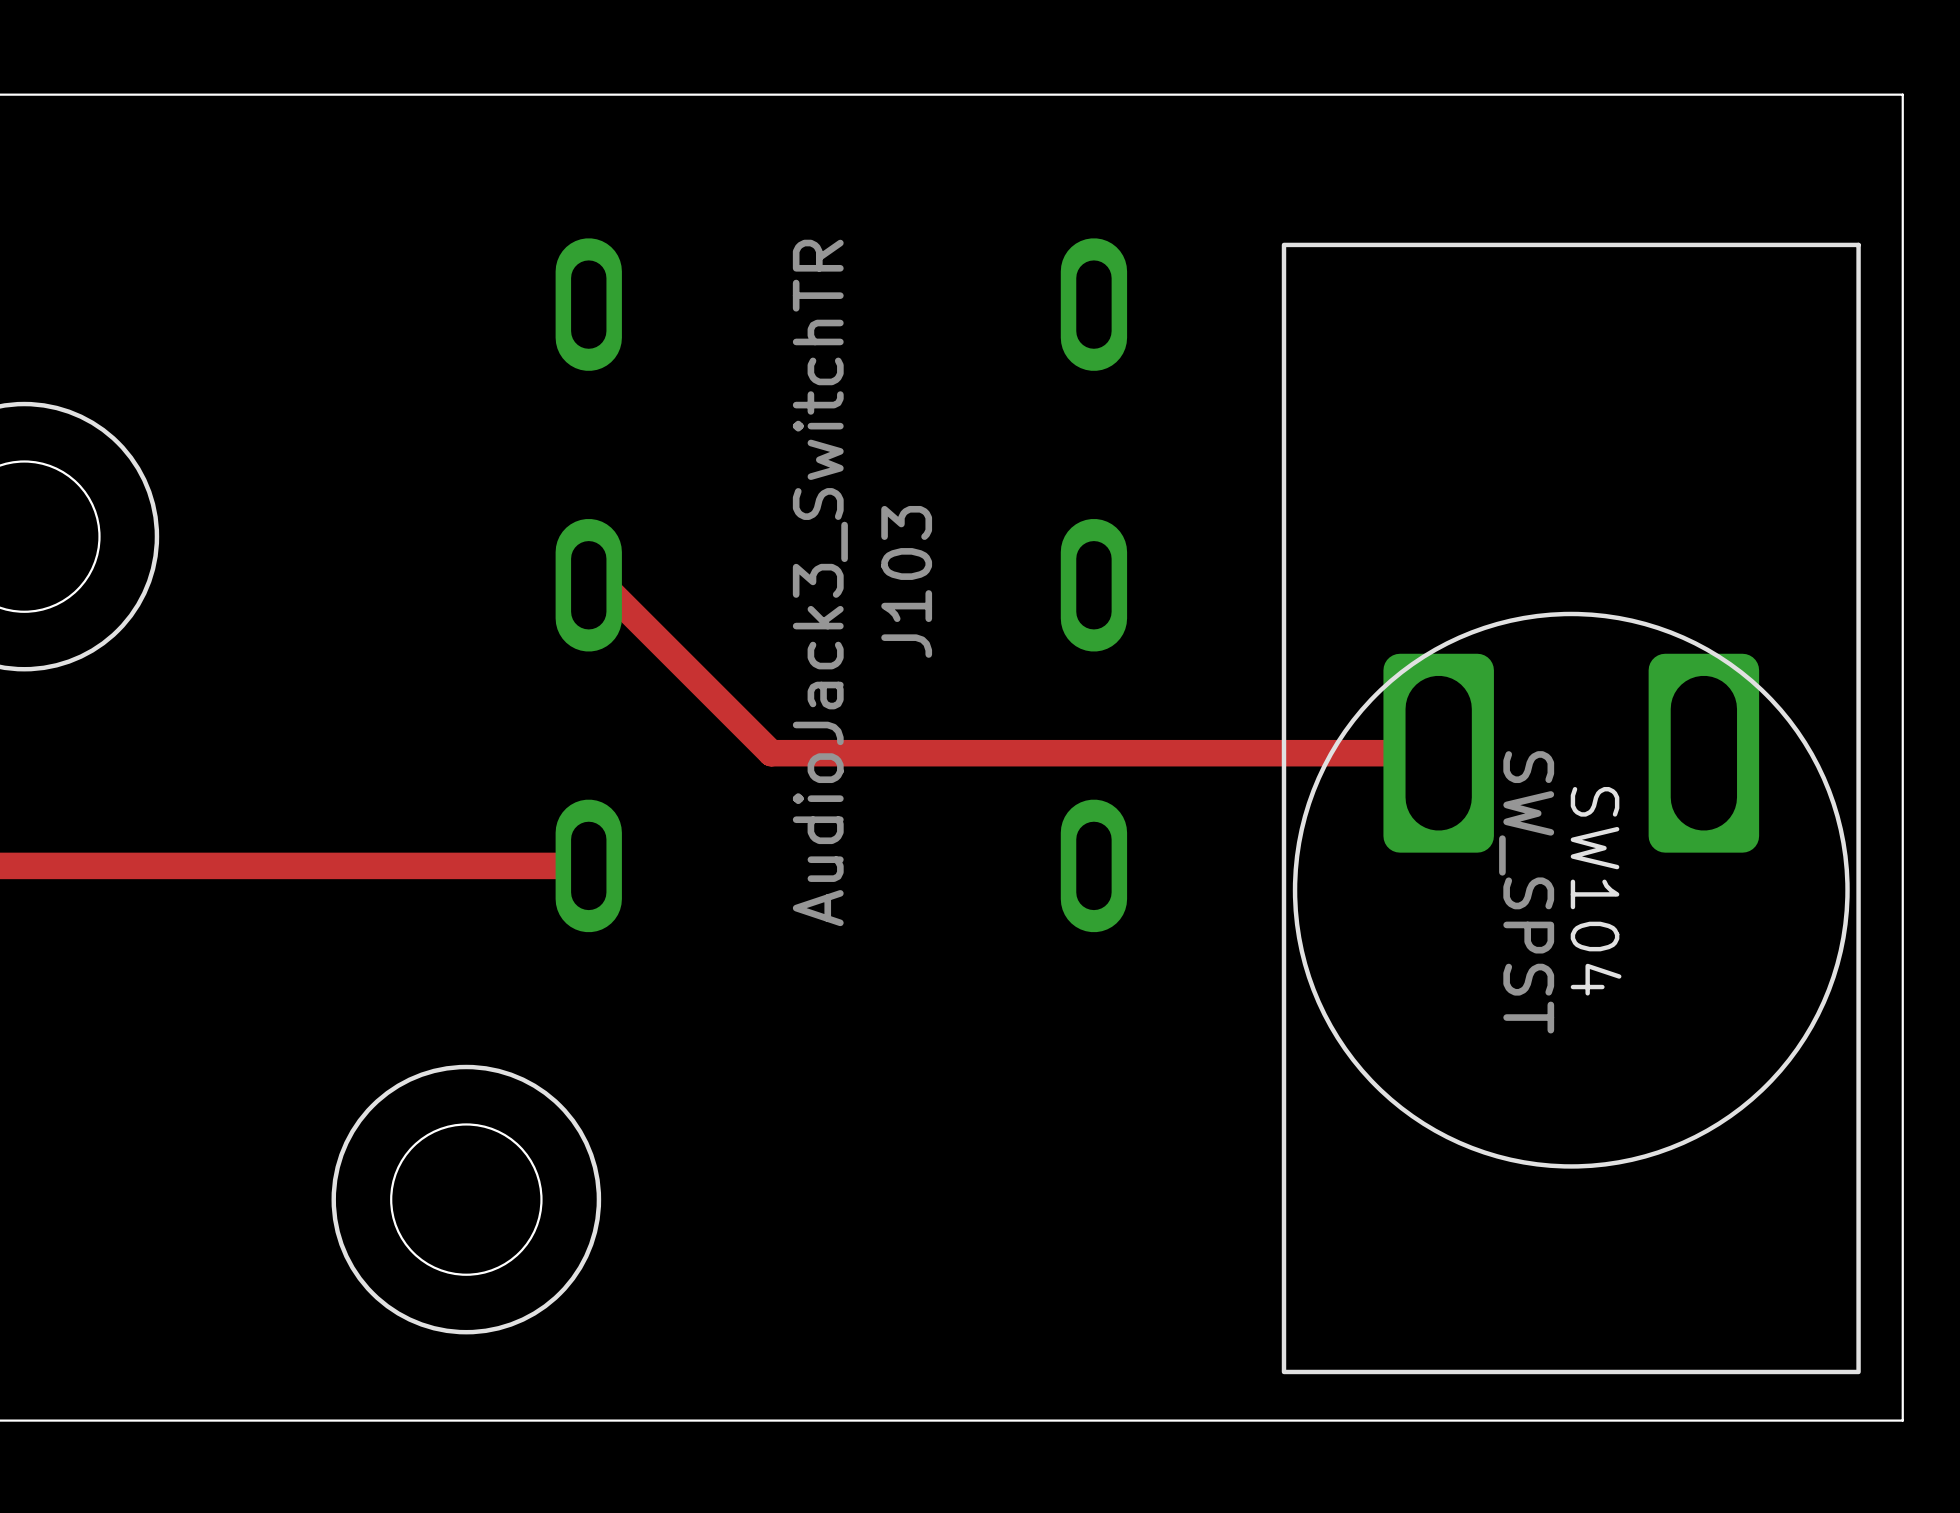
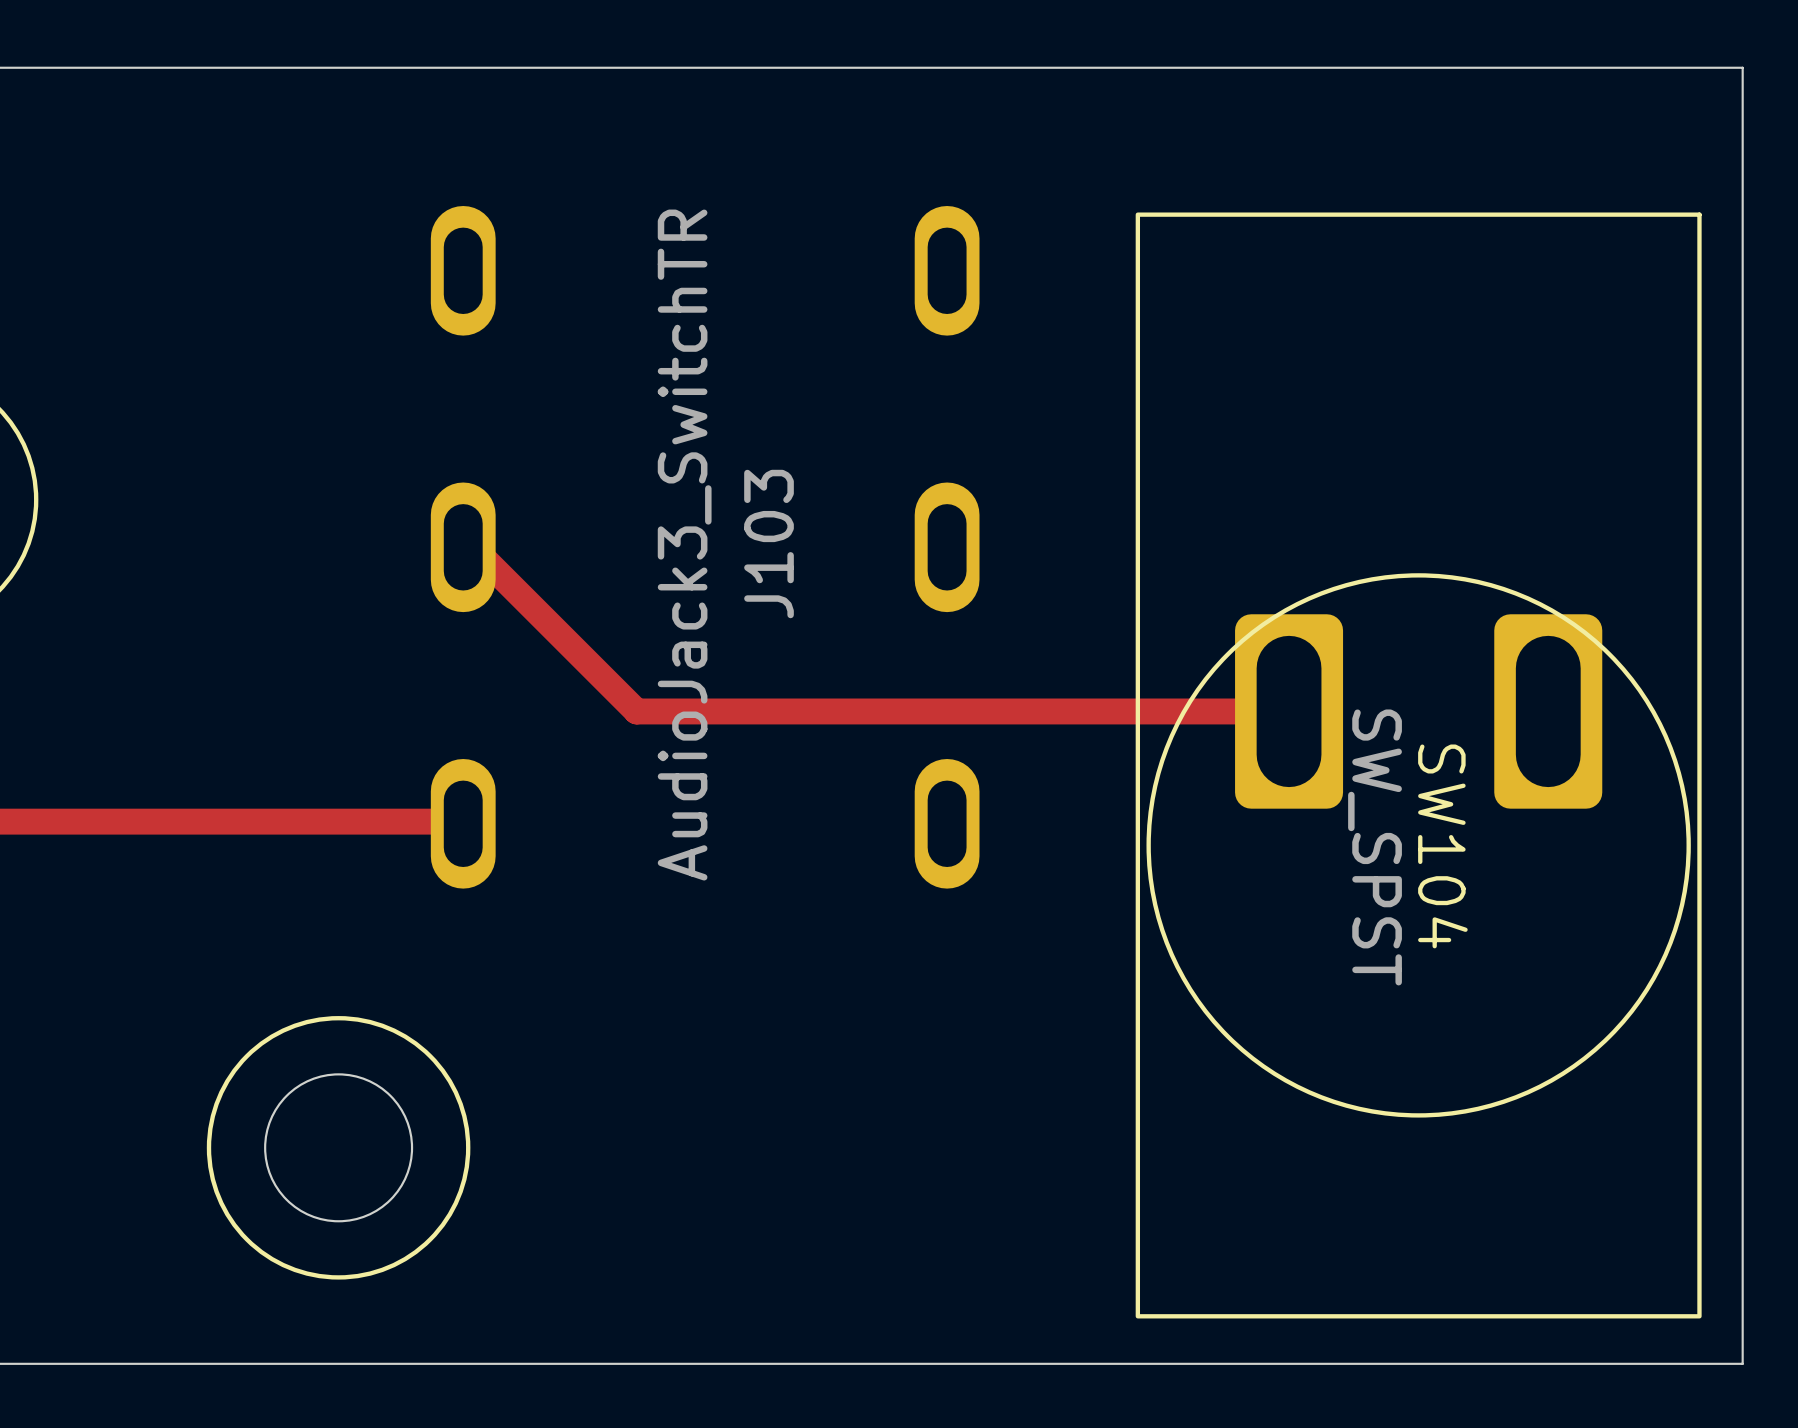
J103 footprint: [555, 238, 1128, 933] -> [430, 206, 980, 889]

